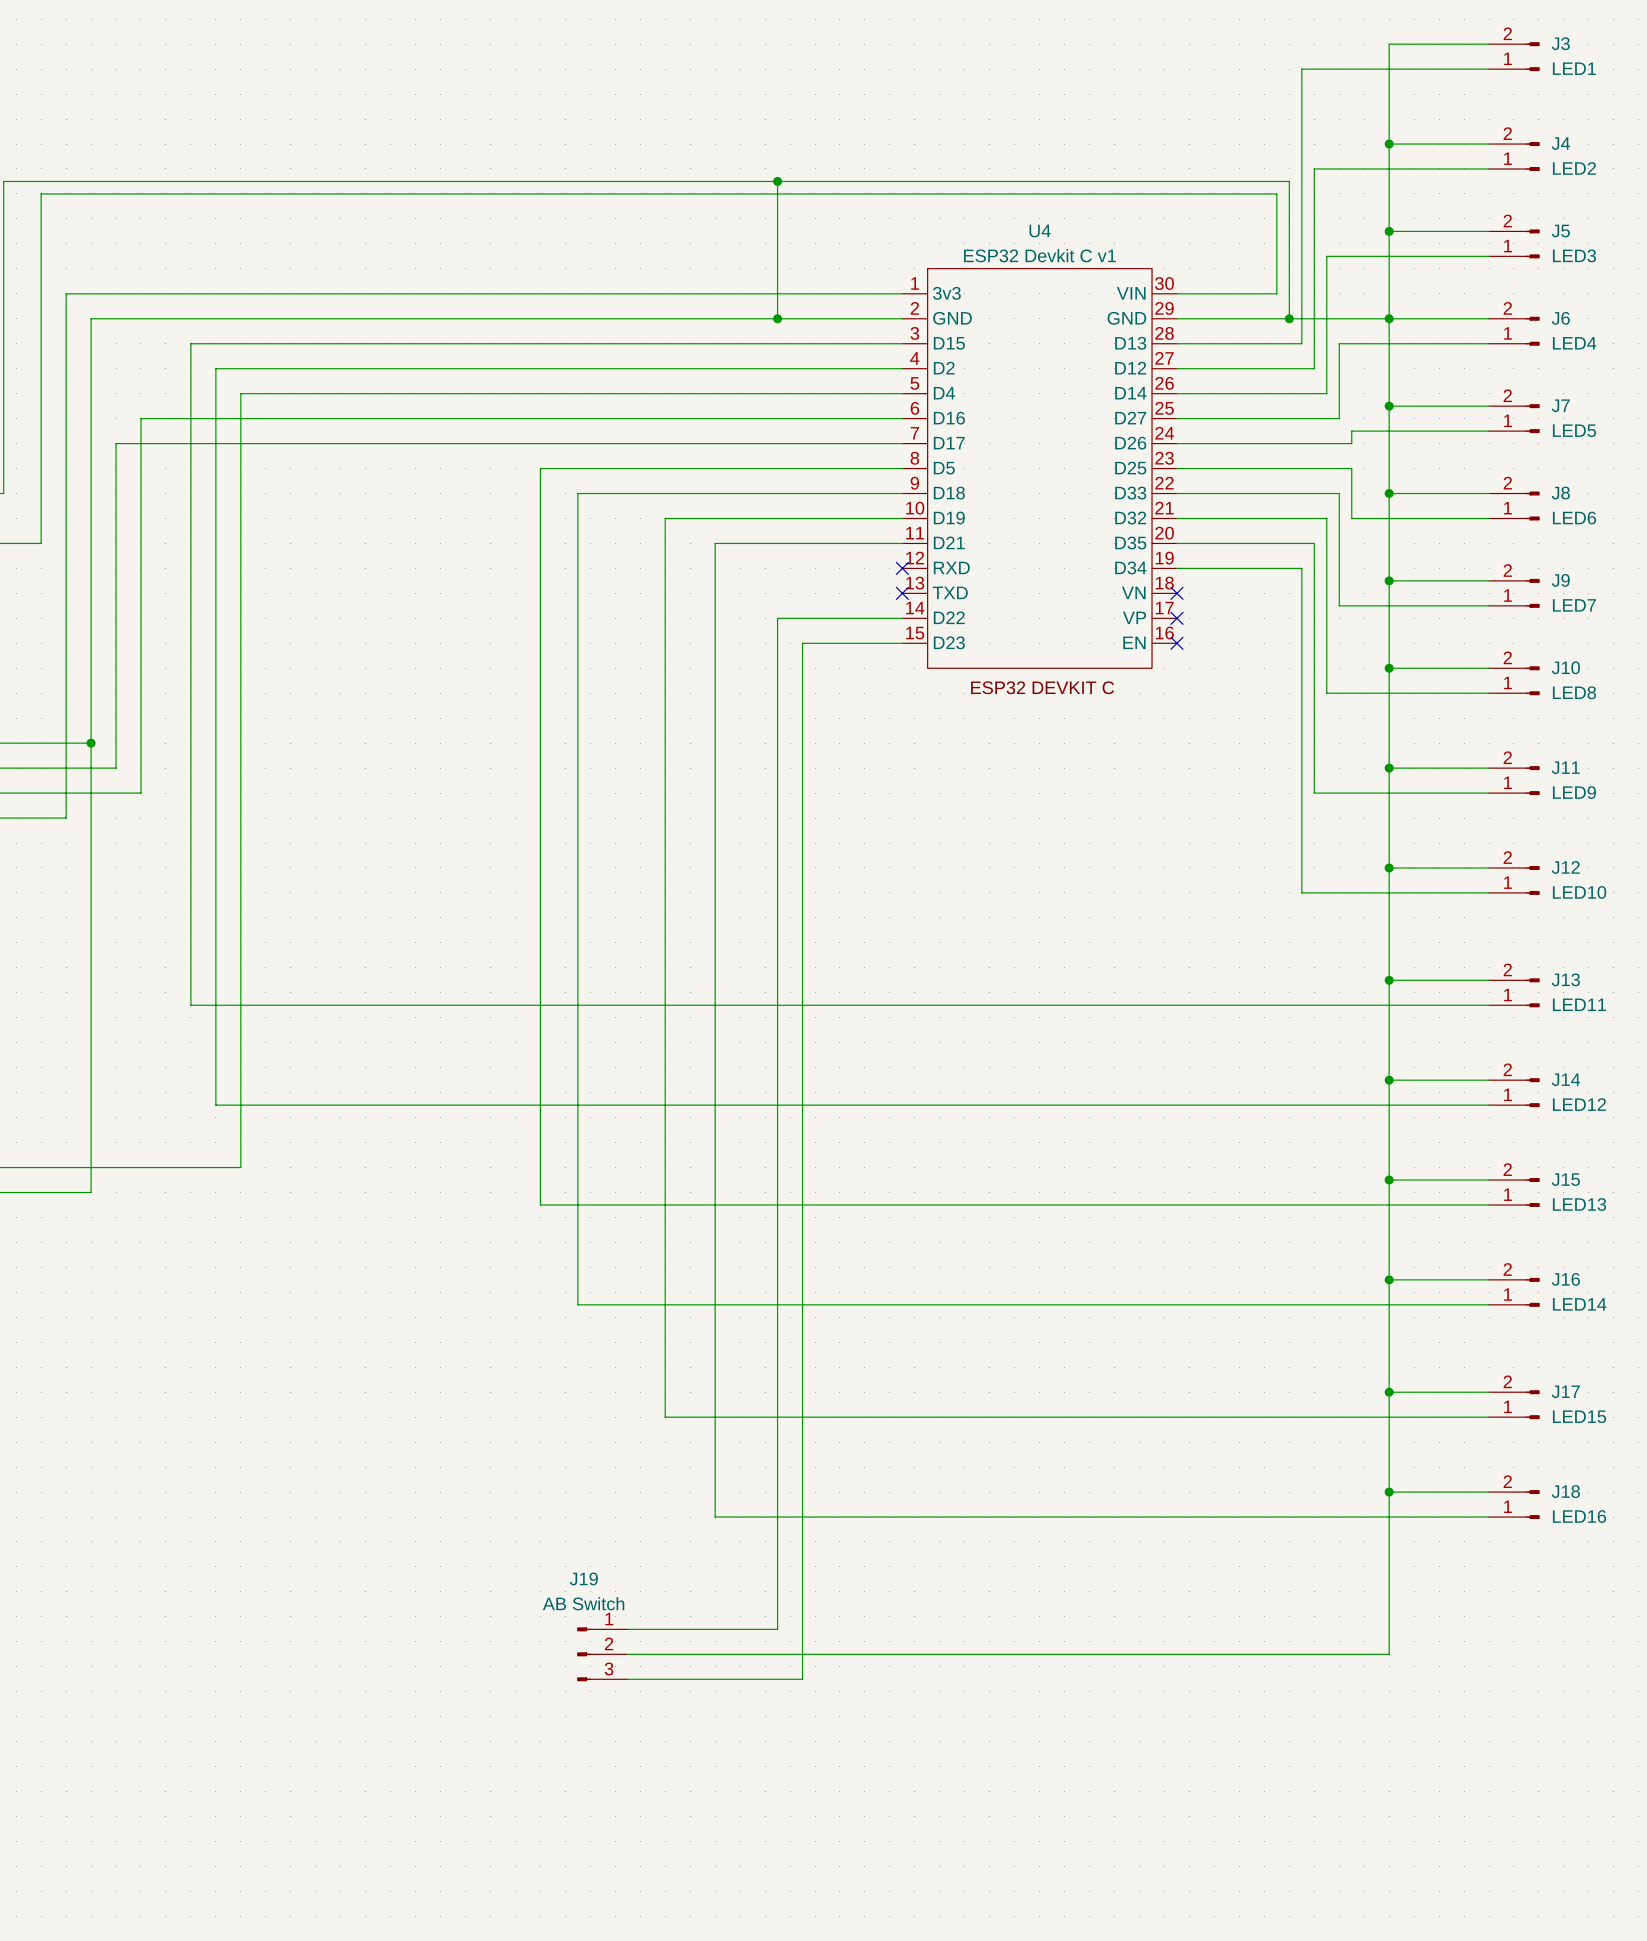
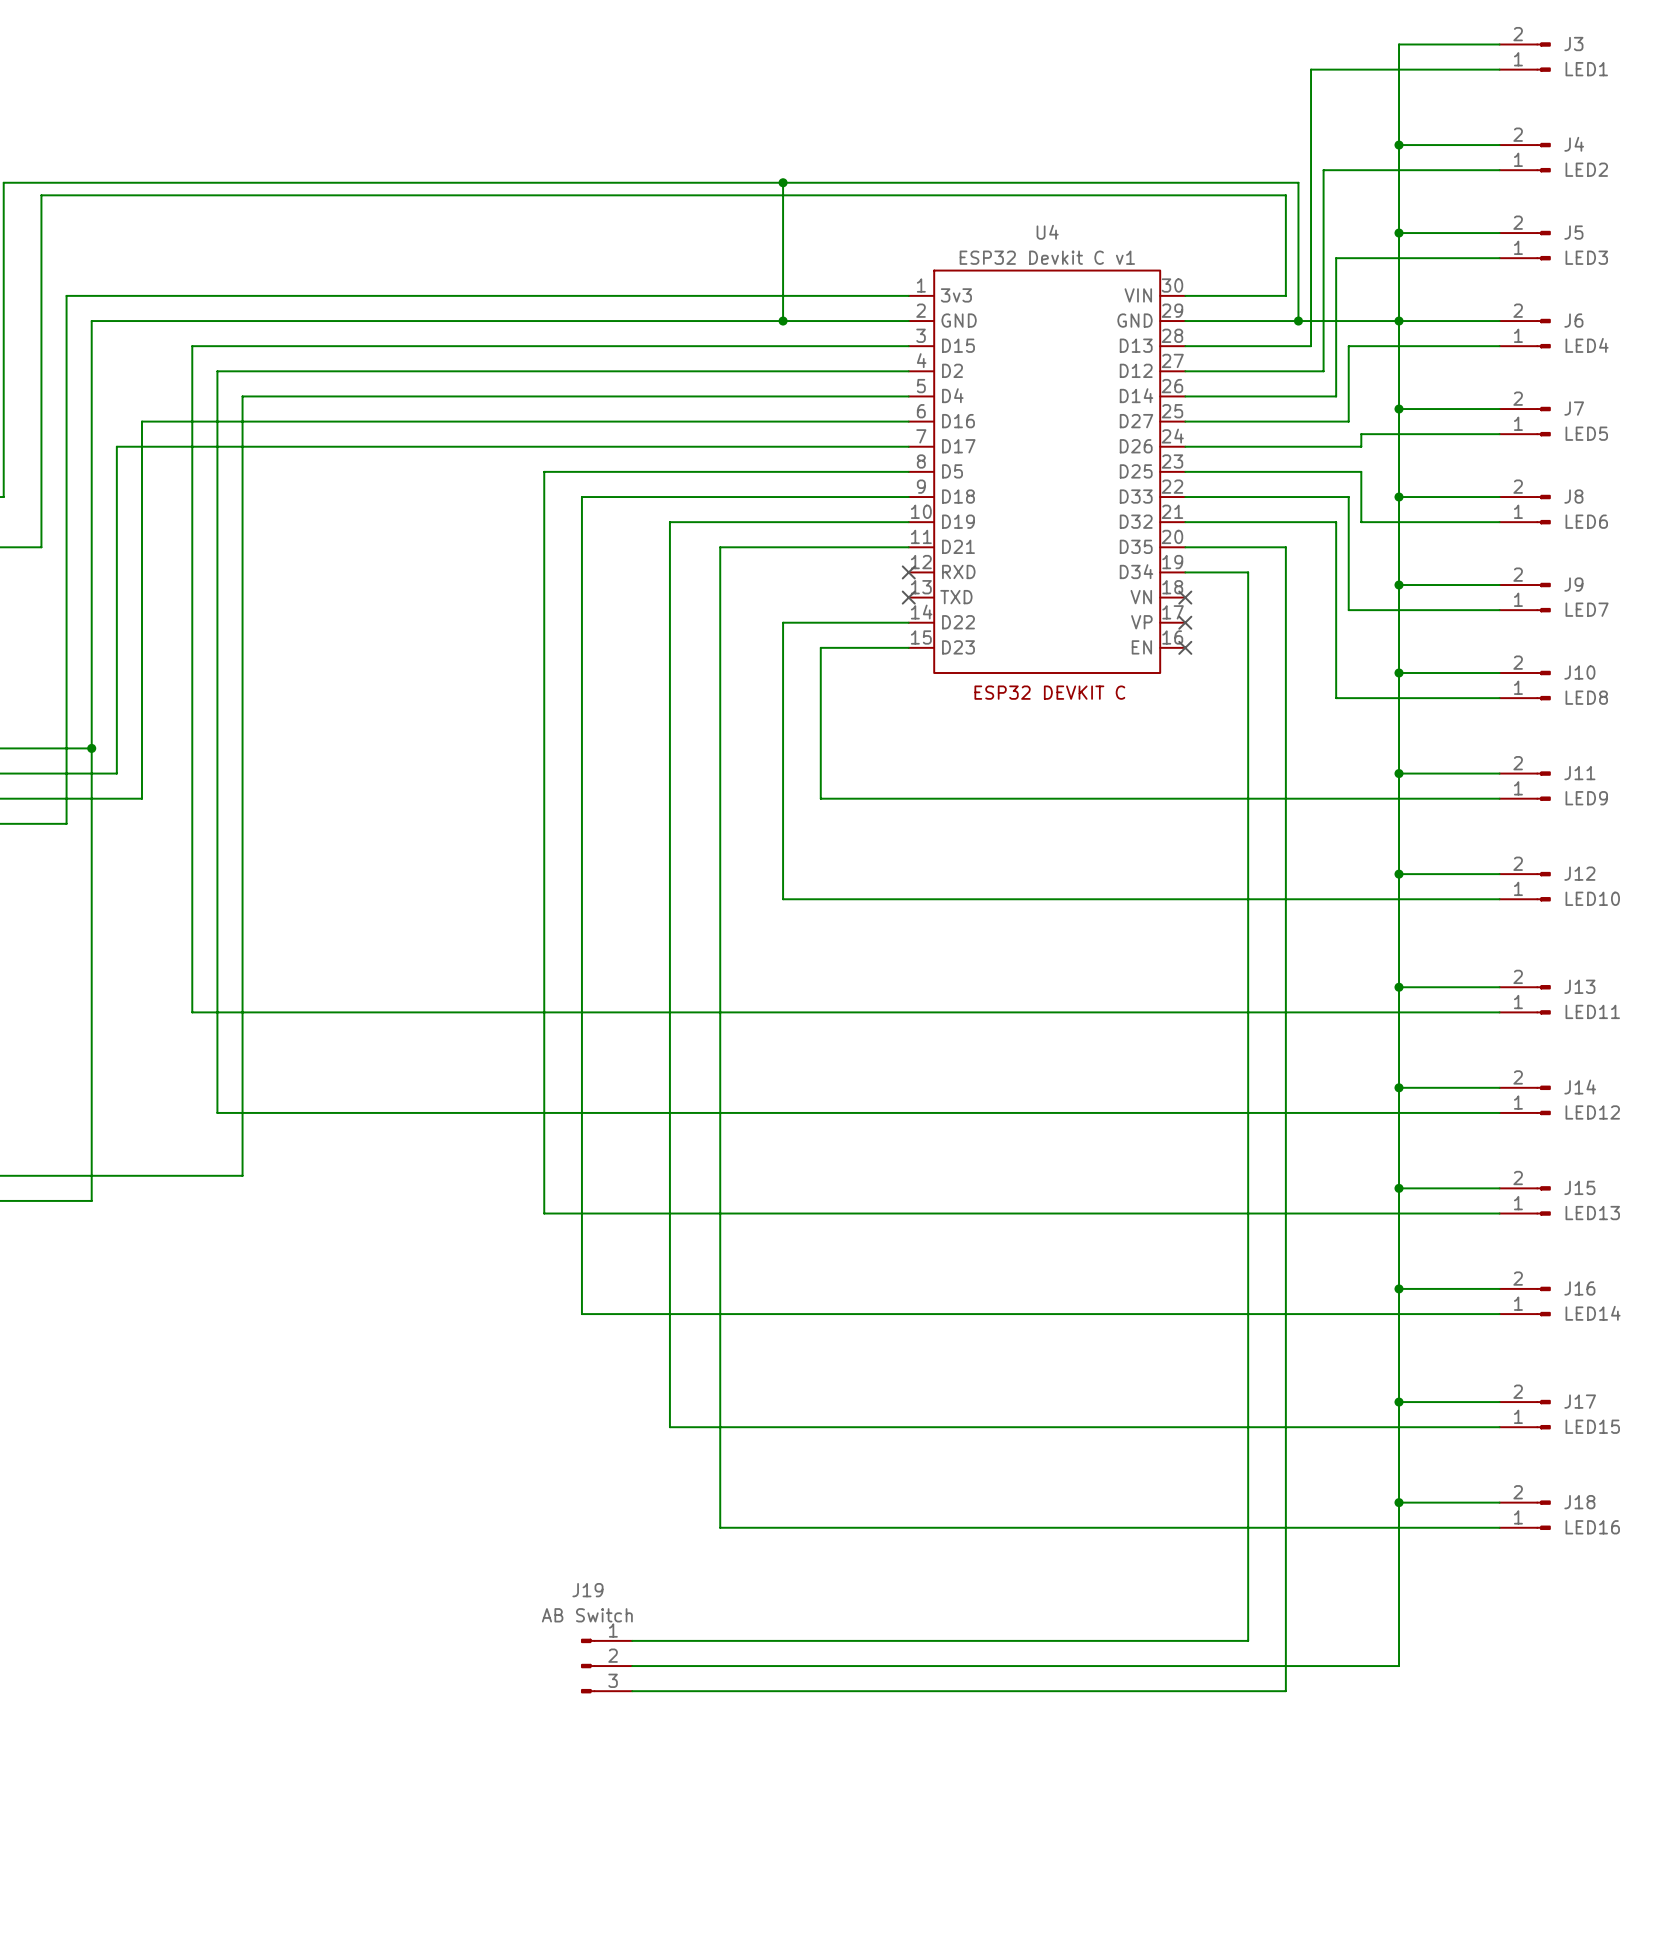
wire: (1276, 543) (1314, 543) (1314, 793) -> (820, 647) (820, 798) (1323, 798)
wire: (1239, 568) (1301, 568) (1301, 892) -> (783, 899) (1311, 899)
wire: (815, 643) (802, 643) (802, 1679) -> (1285, 547) (1285, 1691) (808, 1691)
wire: (777, 892) (777, 1629) -> (1248, 572) (1248, 1640) (783, 1640)

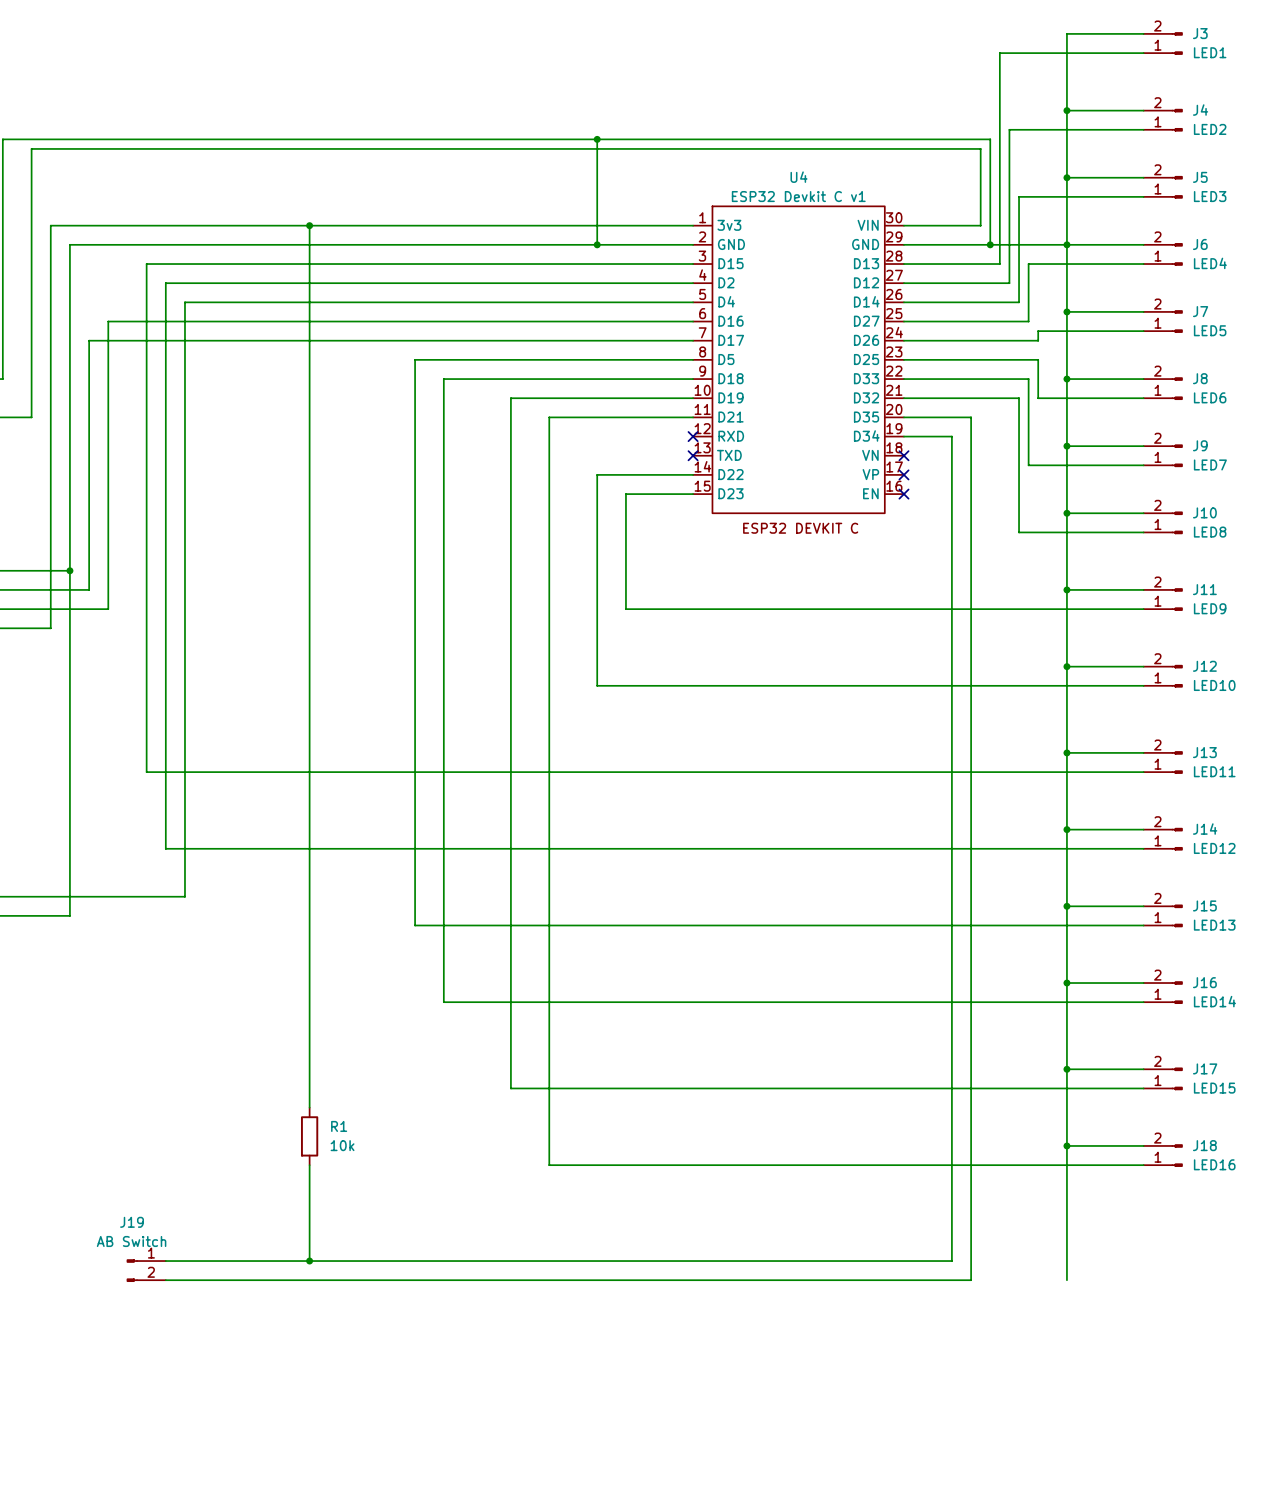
wire: none -> (309, 225) (309, 1107)
junction: none -> (309, 225)
wire: (1273, 547) (1285, 547) (1285, 1691) (632, 1691) -> (971, 417) (971, 1280) (165, 1280)
R1: none -> 10k (309, 1136)
wire: none -> (309, 1165) (309, 1261)
J19 symbol: [581, 1638, 633, 1694] -> [126, 1259, 166, 1282]
wire: (632, 1640) (1248, 1640) -> (165, 1261) (951, 1261) (951, 1251)
junction: none -> (309, 1261)
wire: (632, 1666) (1399, 1666) -> (1066, 1280) (1066, 1270)

